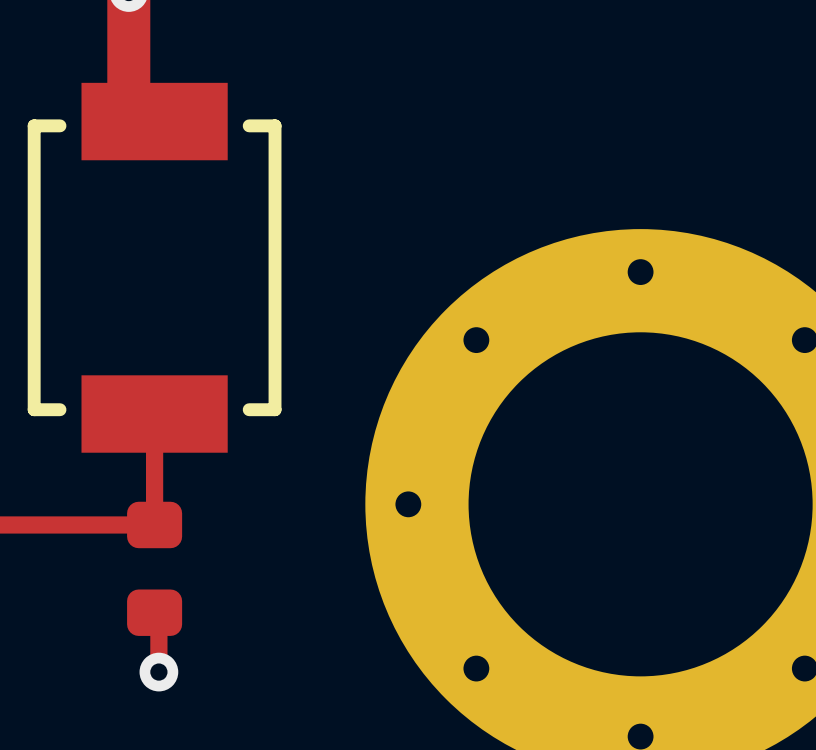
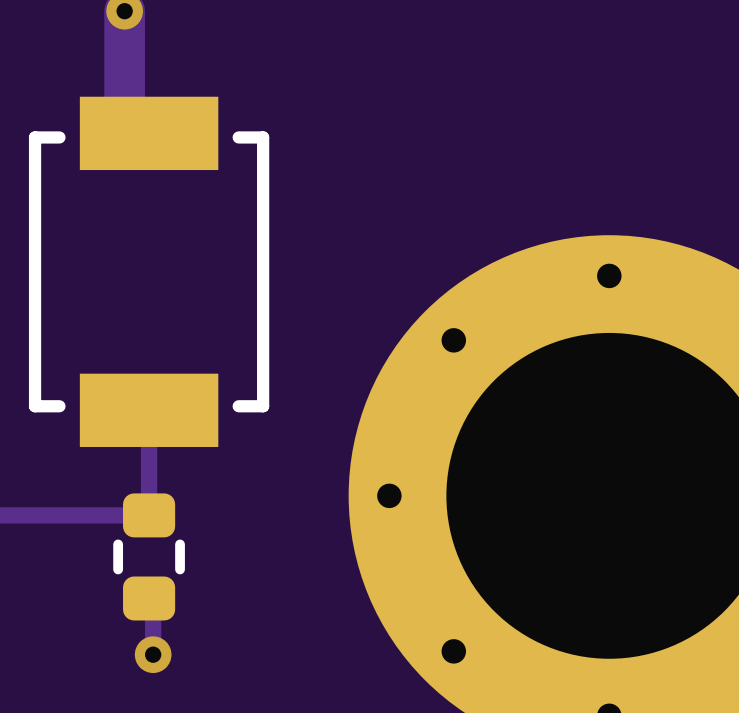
part footprint: [127, 501, 183, 636] -> [113, 493, 185, 621]

